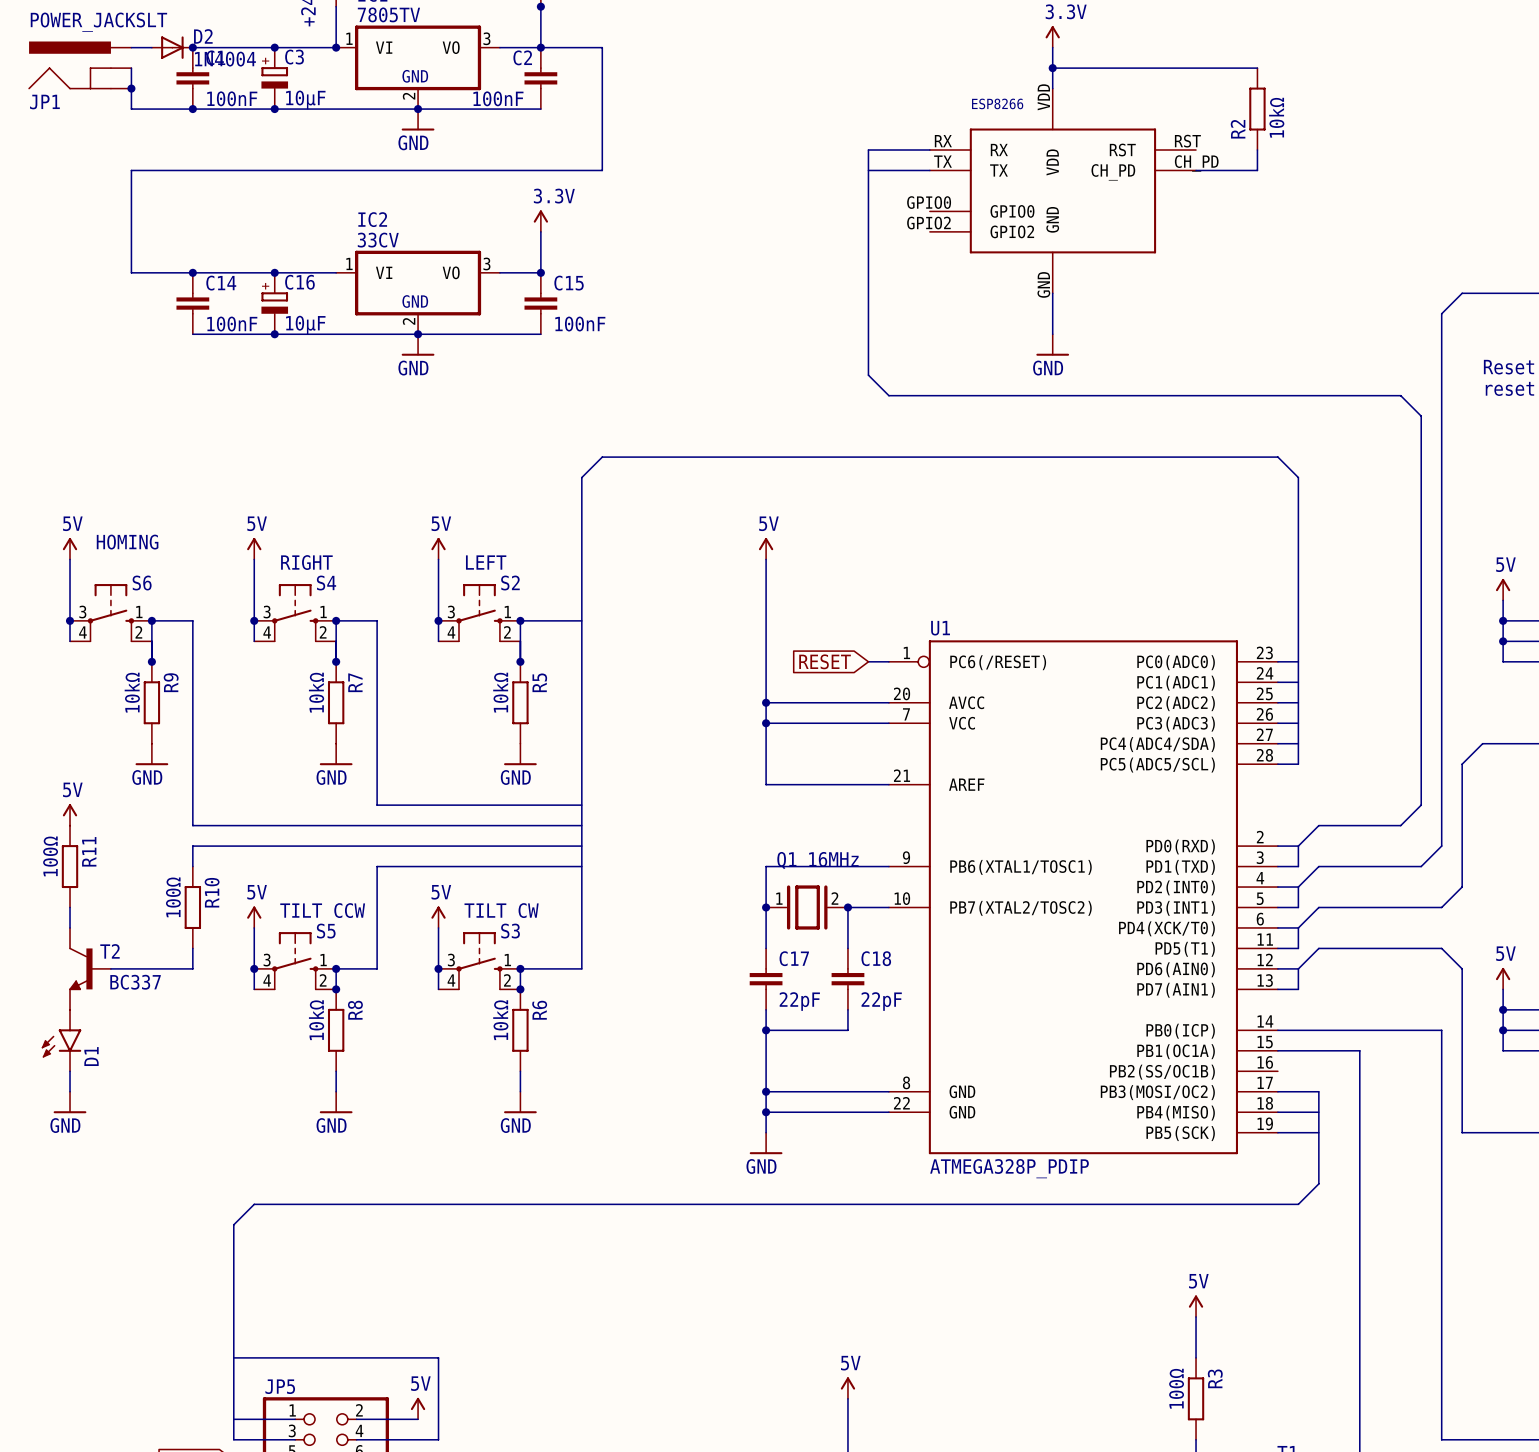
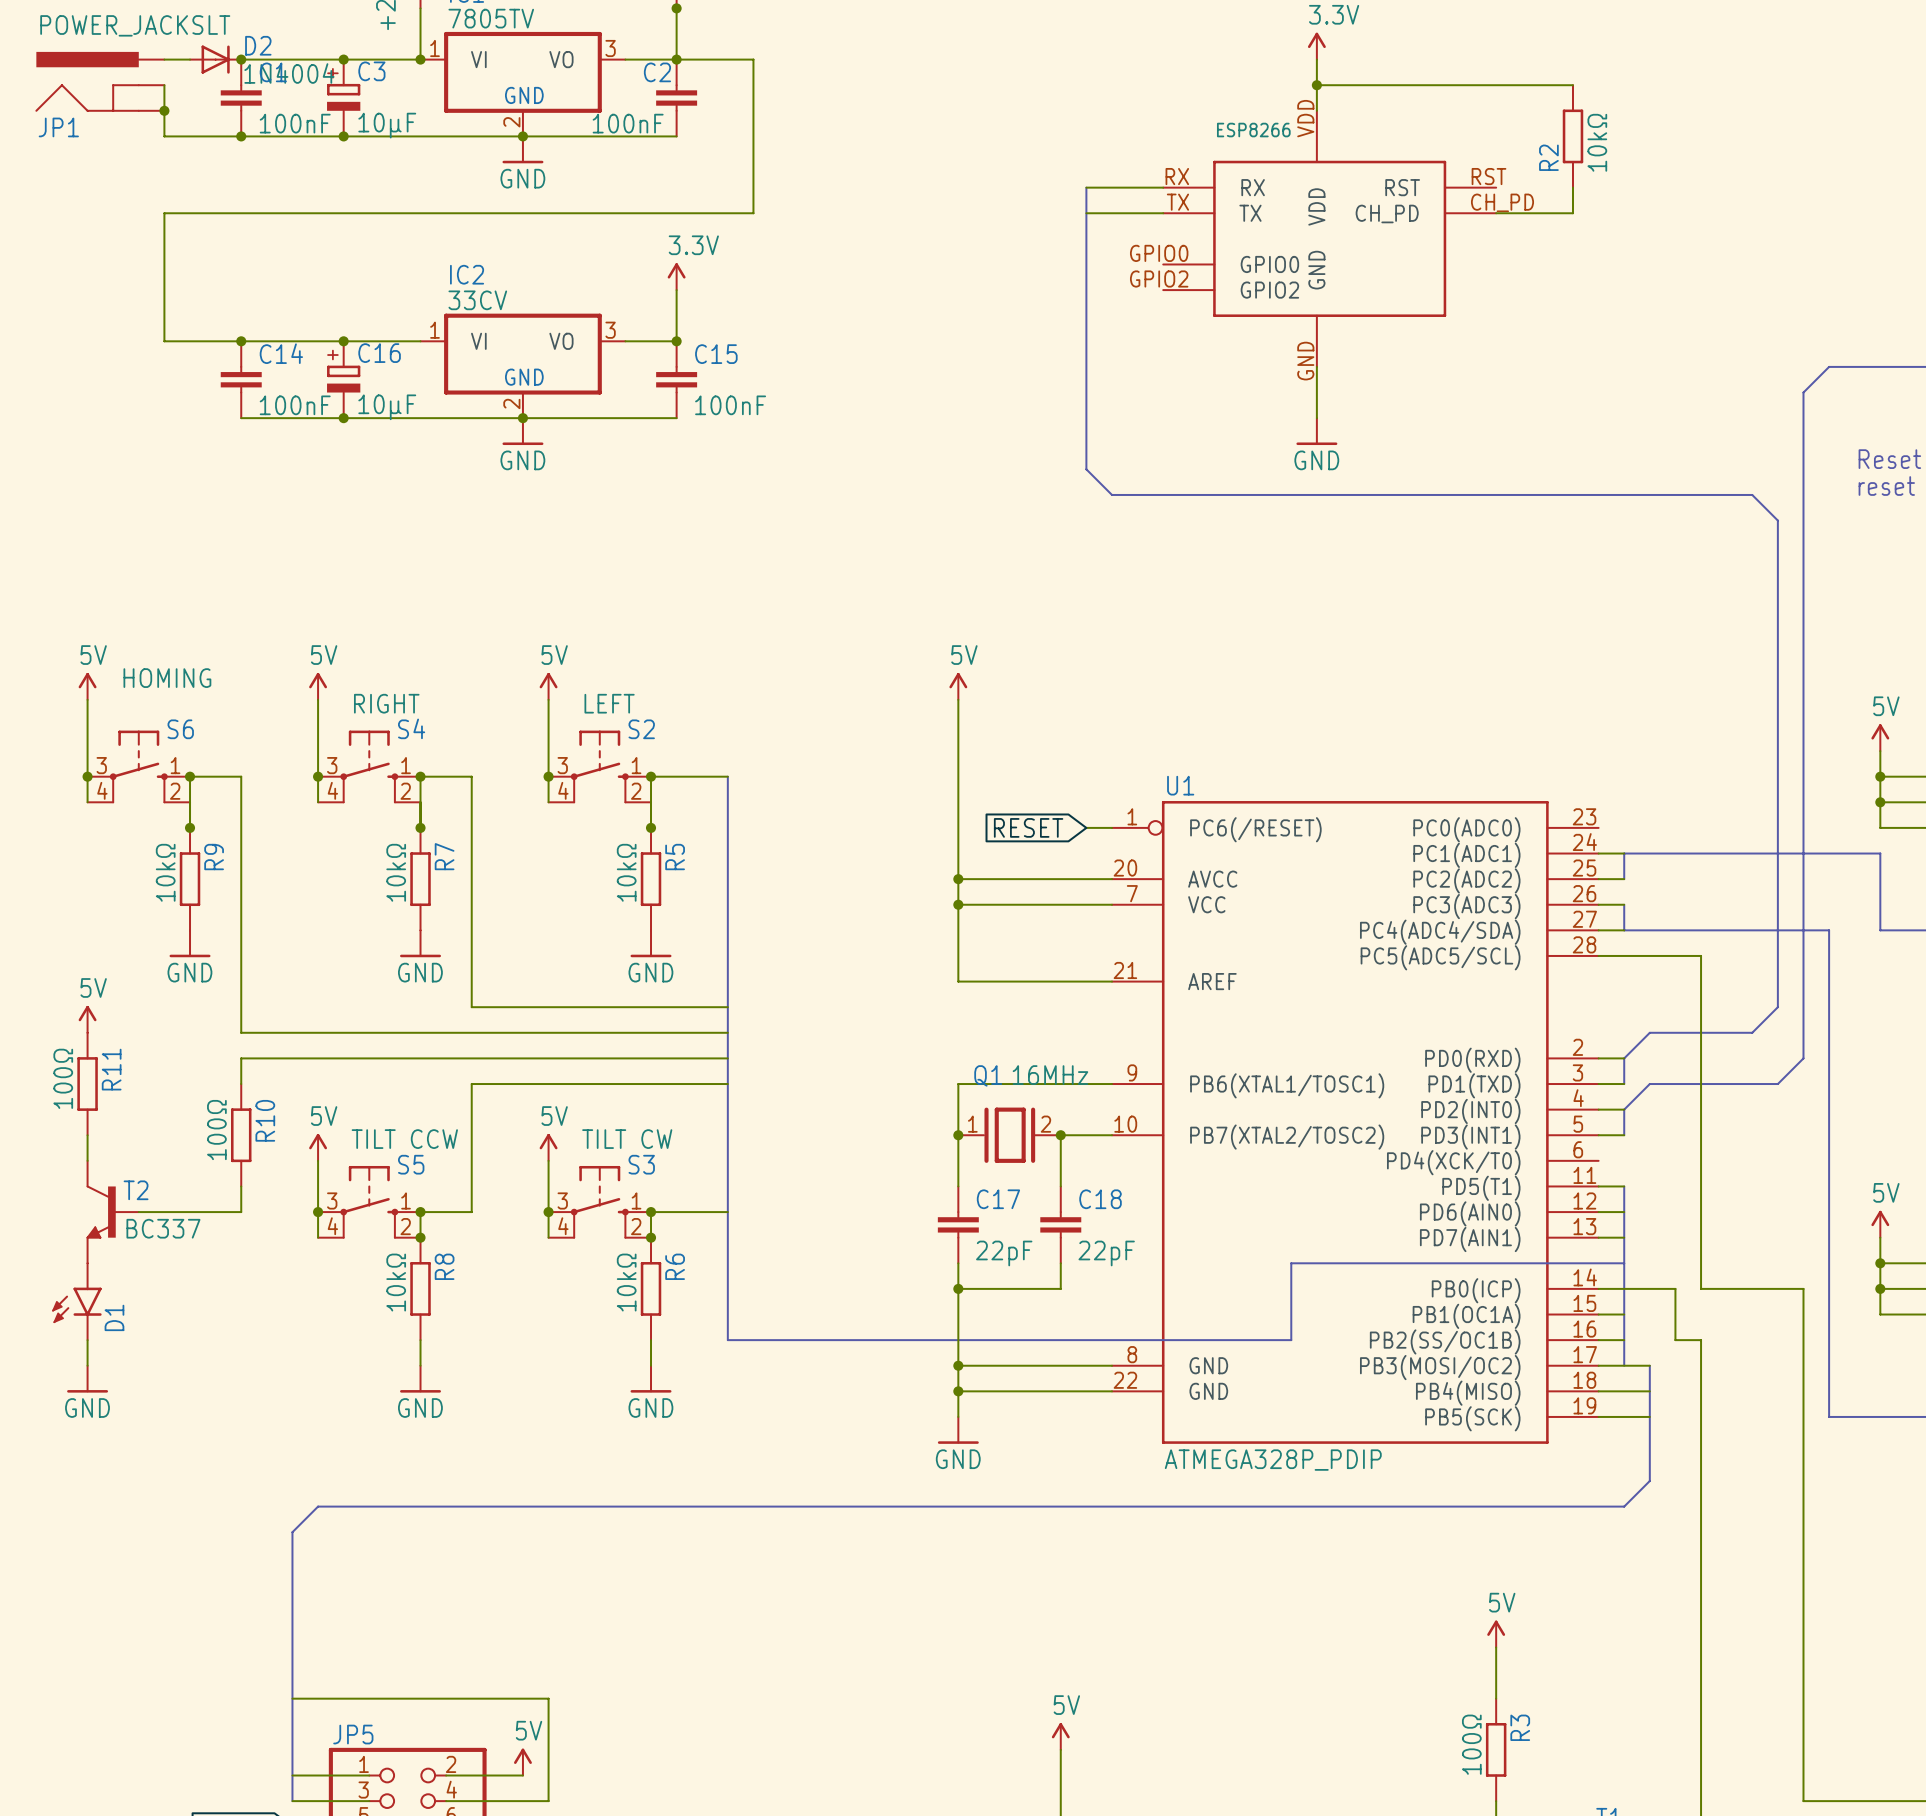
bus: (581, 620) (581, 477) (602, 457) (1277, 457) (1298, 477) (1298, 682) -> none
wire: (1277, 661) (1298, 661) -> none
bus: (1298, 702) (1298, 723) -> none
bus: (1298, 743) (1298, 764) -> (1624, 930) (1829, 930) (1829, 955)
bus: (1503, 743) (1482, 743) (1462, 764) -> (1880, 930) (1880, 853) (1624, 853)
wire: none -> (1624, 955) (1701, 955) (1701, 1288)
bus: (1462, 887) (1441, 907) (1318, 907) (1298, 927) (1298, 948) -> (1829, 1109) (1829, 1212)
wire: (1277, 927) (1298, 927) -> (1598, 1340) (1624, 1340)
bus: none -> (727, 1212) (727, 1340) (1291, 1340) (1291, 1263) (1624, 1263)
bus: (1298, 968) (1318, 948) (1441, 948) (1462, 968) -> (1624, 1212) (1624, 1186)
bus: none -> (1624, 1237) (1624, 1365)
wire: (1339, 1030) (1359, 1030) -> (1675, 1288) (1675, 1340) (1701, 1340)
wire: (1298, 1050) (1359, 1050) (1359, 1071) -> none

